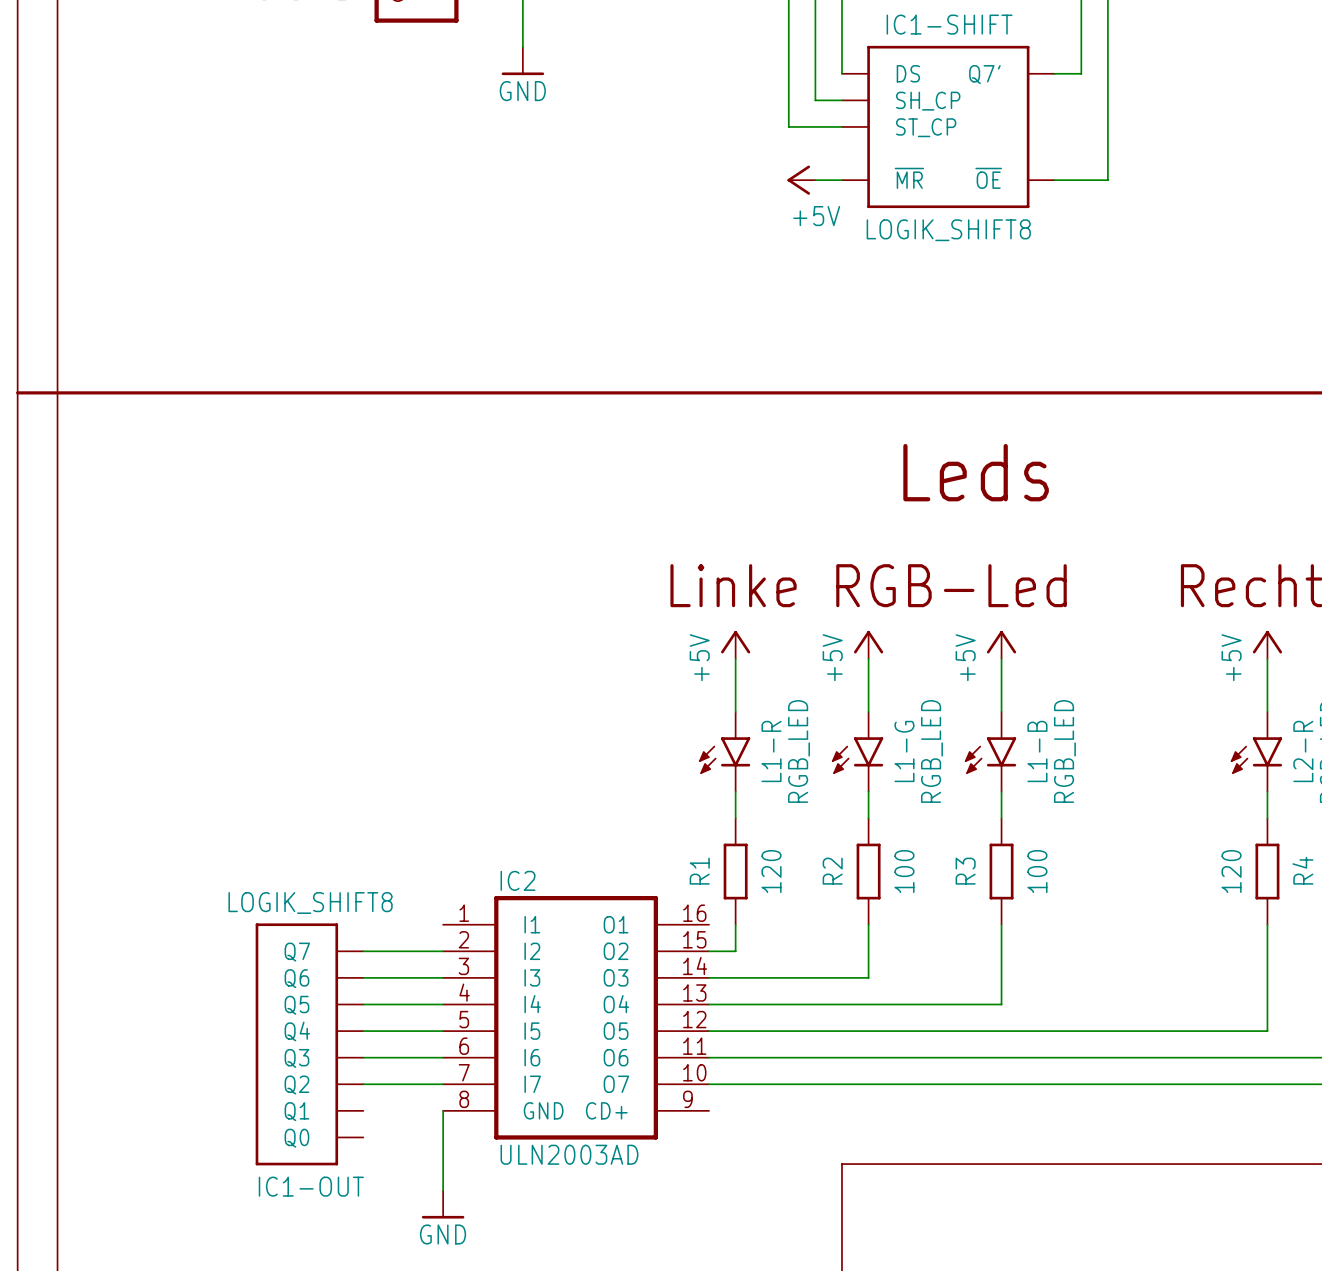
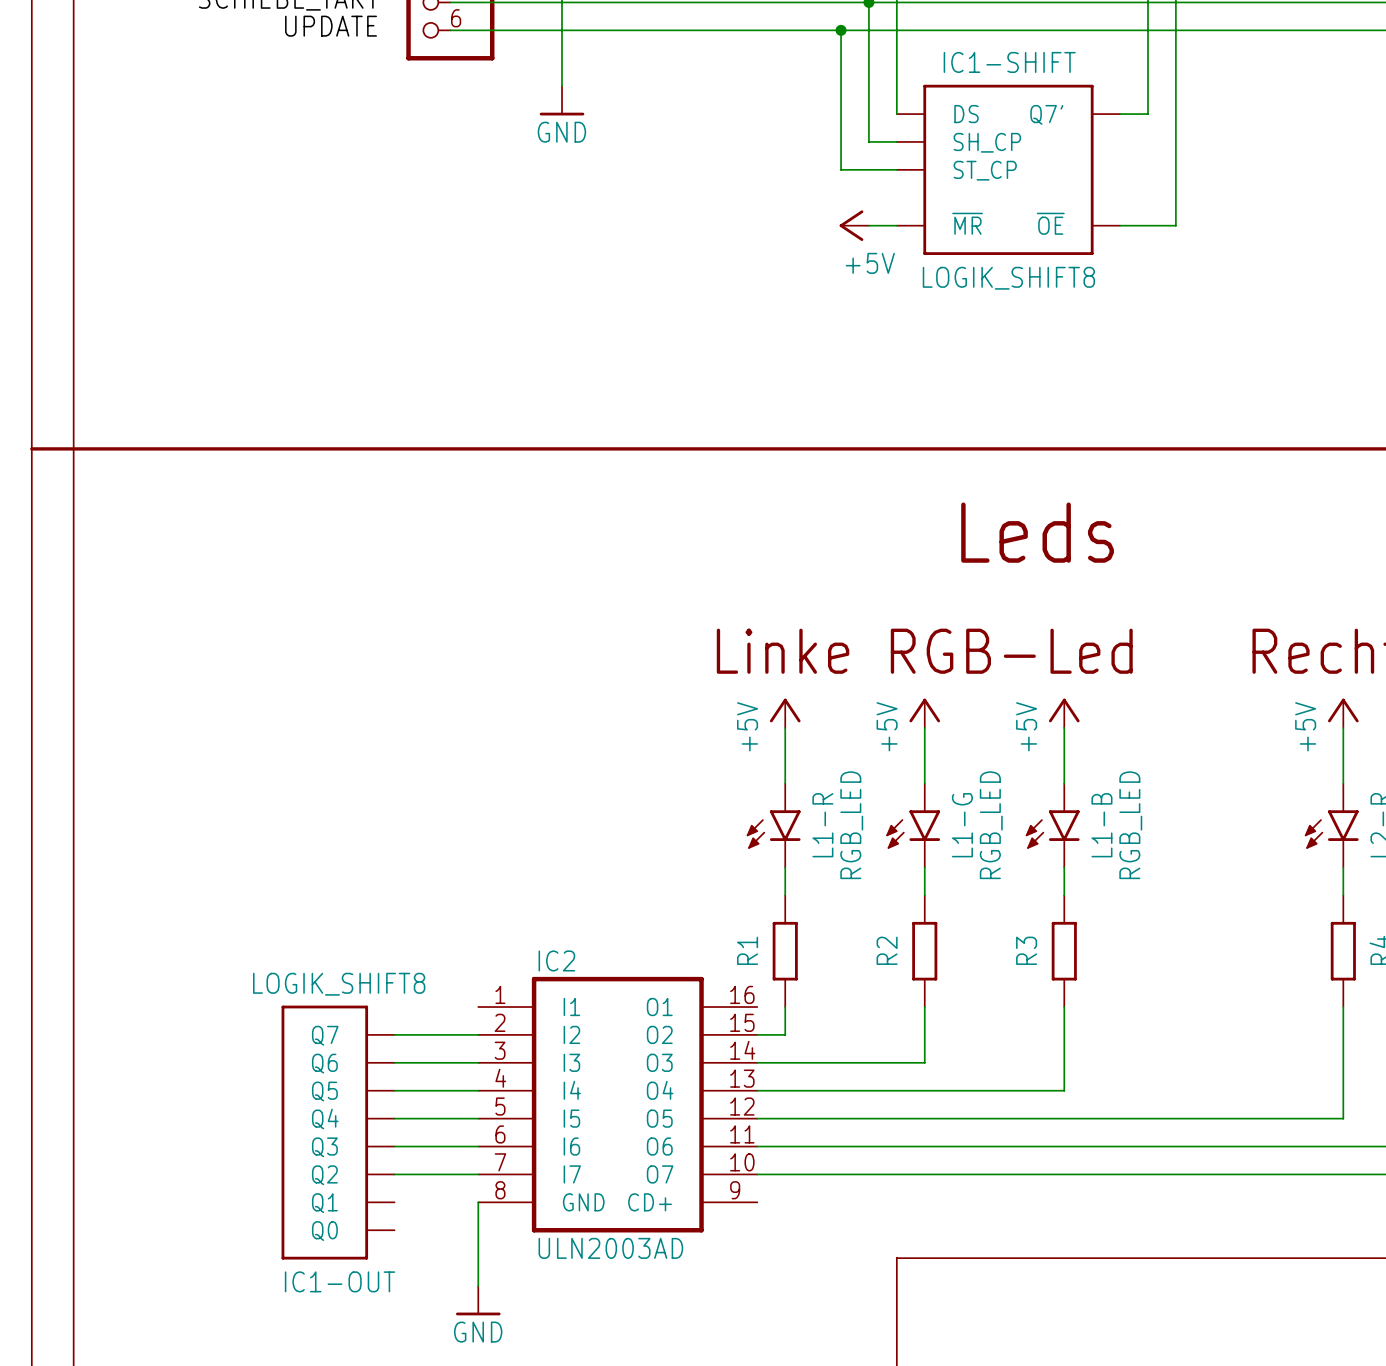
R1 value: 120 (771, 871) -> none
R2 value: 100 (904, 871) -> none
R3 value: 100 (1037, 871) -> none
R4 value: 120 (1231, 871) -> none

